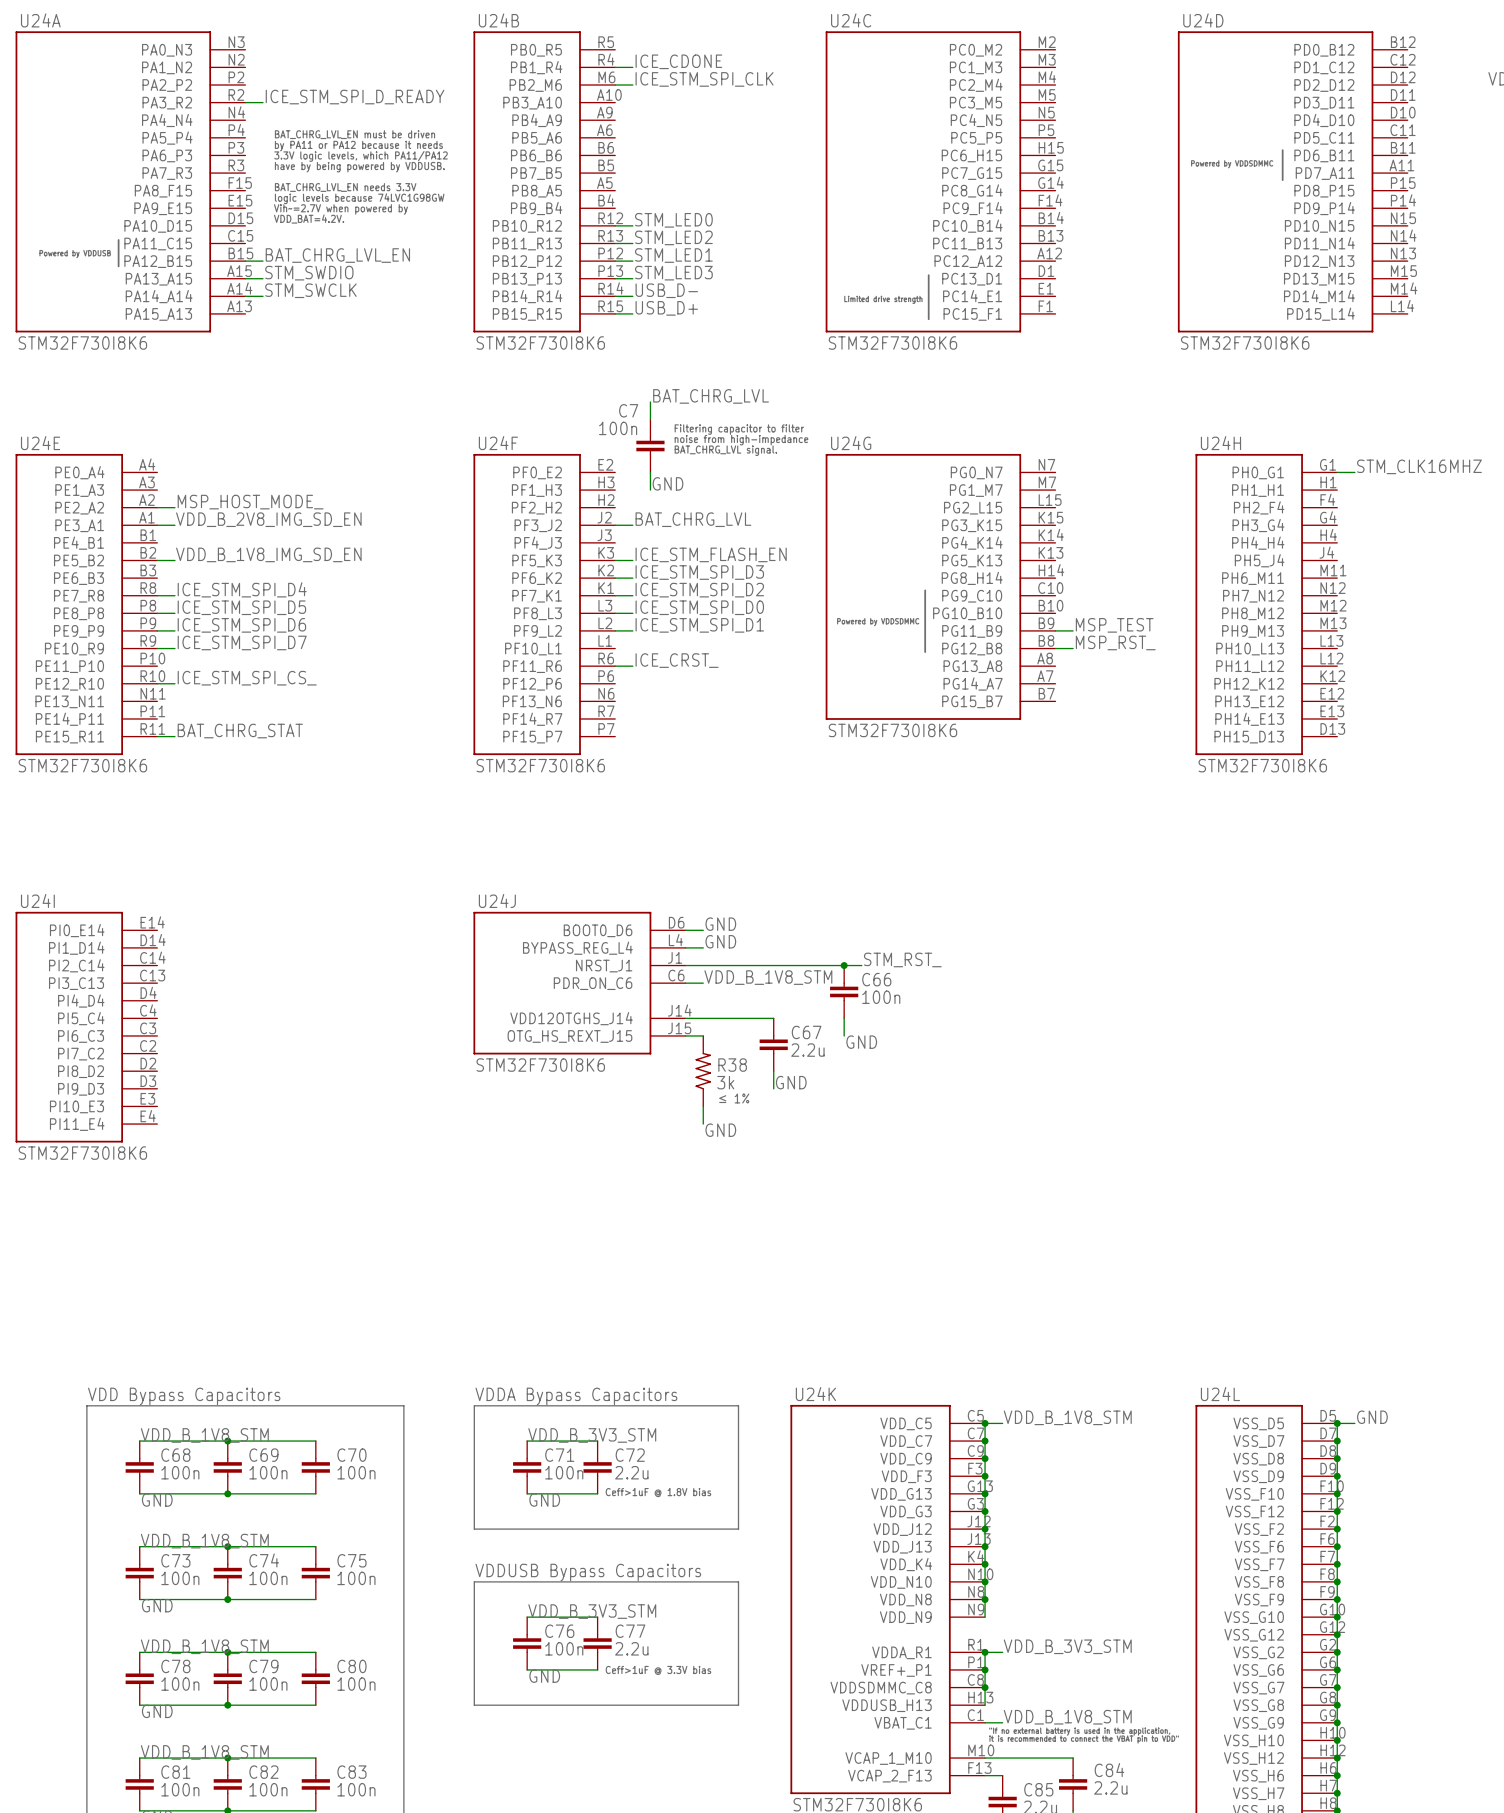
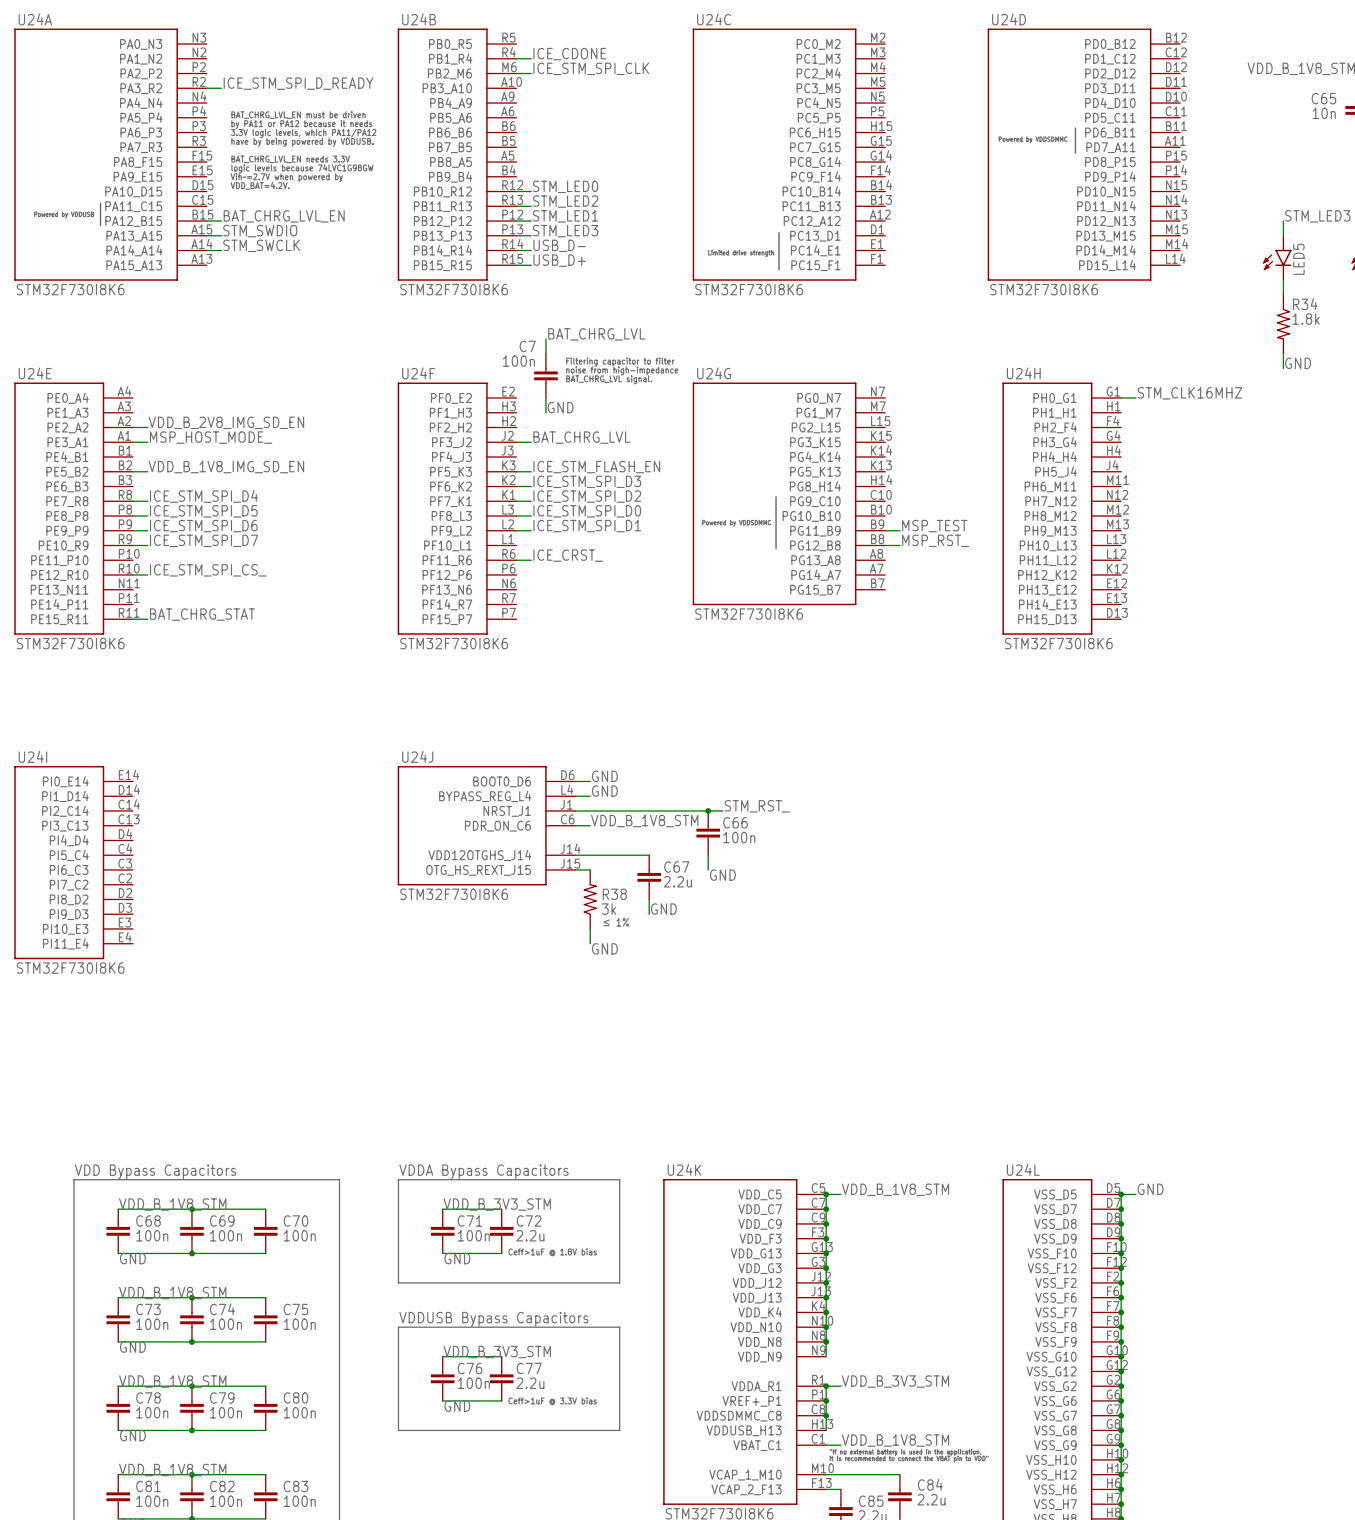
label: MSP_HOST_MODE_ (250, 502) -> VDD_B_2V8_IMG_SD_EN (226, 422)
label: VDD_B_2V8_IMG_SD_EN (268, 519) -> MSP_HOST_MODE_ (211, 437)

